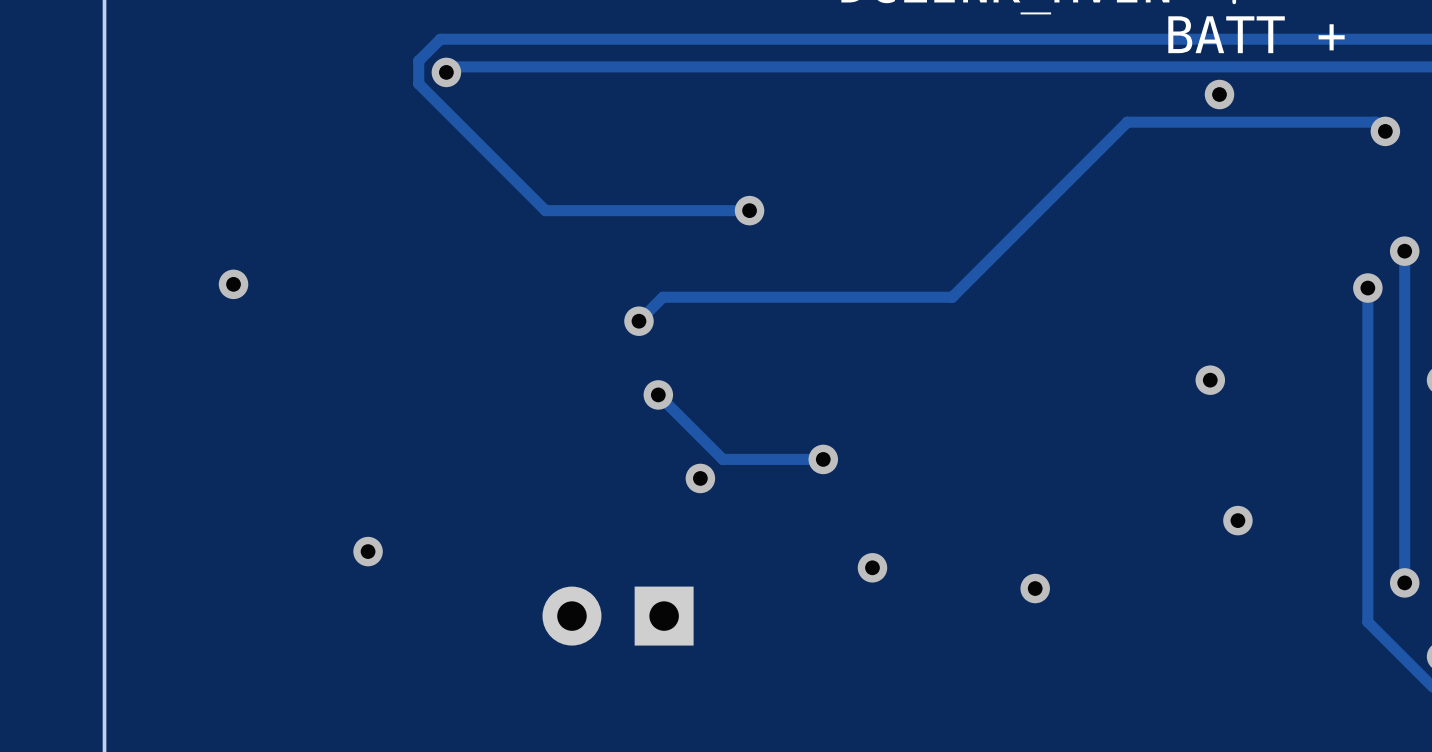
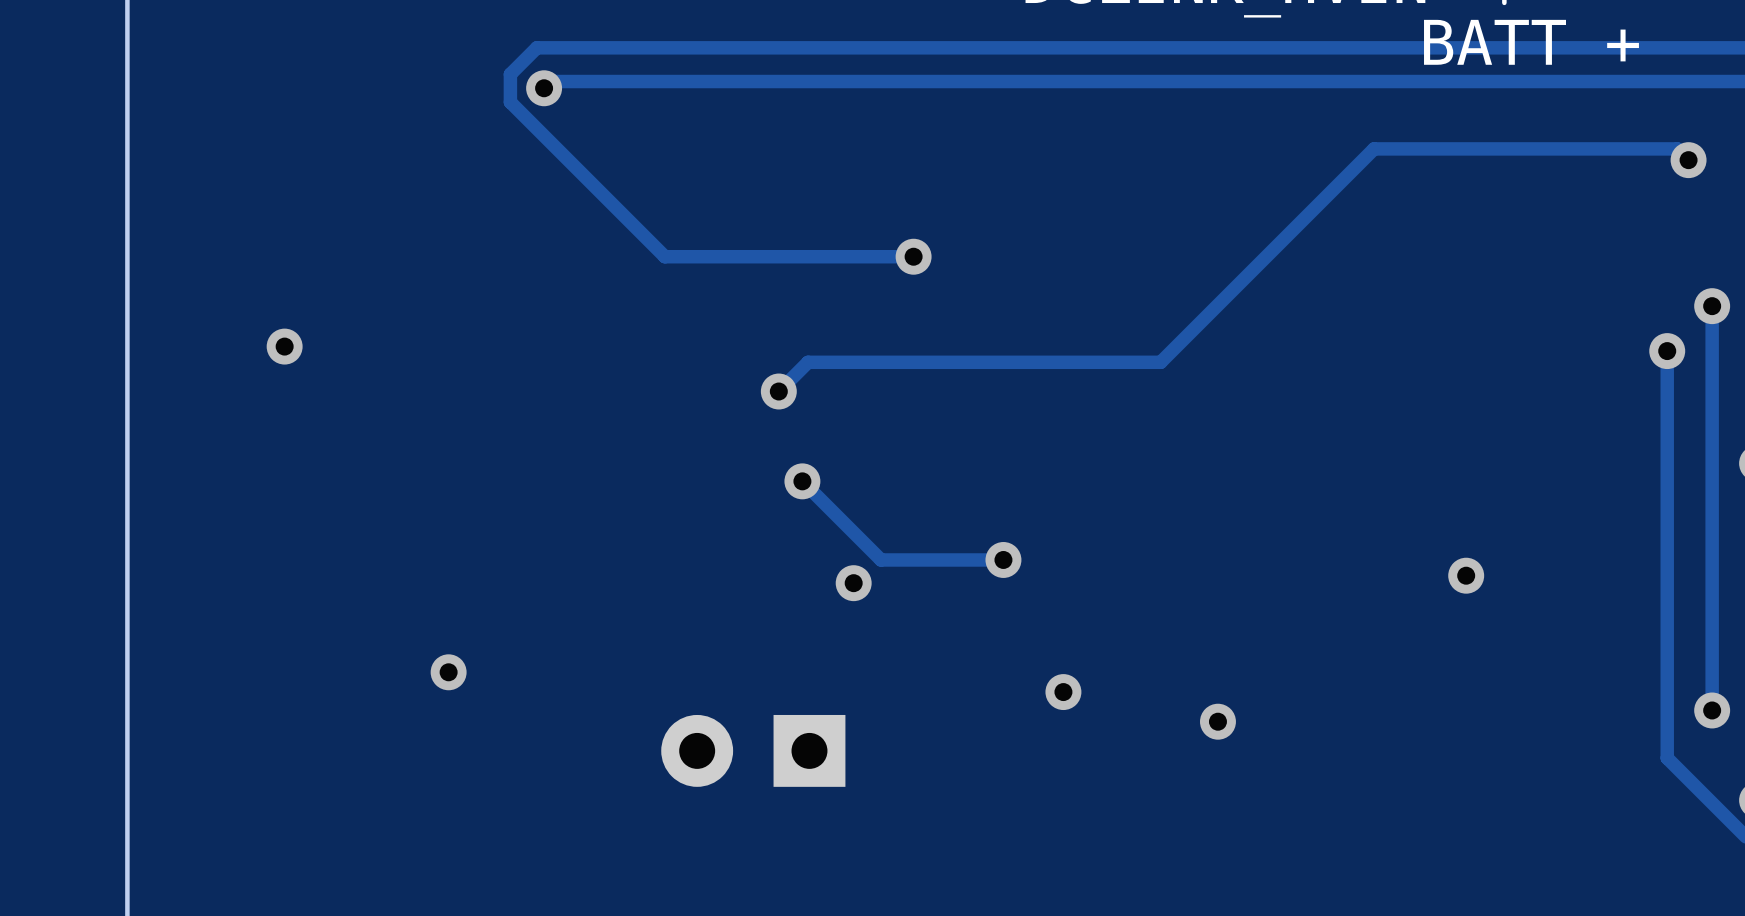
via: (1219, 94) -> none
via: (1210, 380) -> none
via: none -> (1466, 575)
via: (1237, 520) -> none
via position: (1035, 588) -> (1217, 721)

